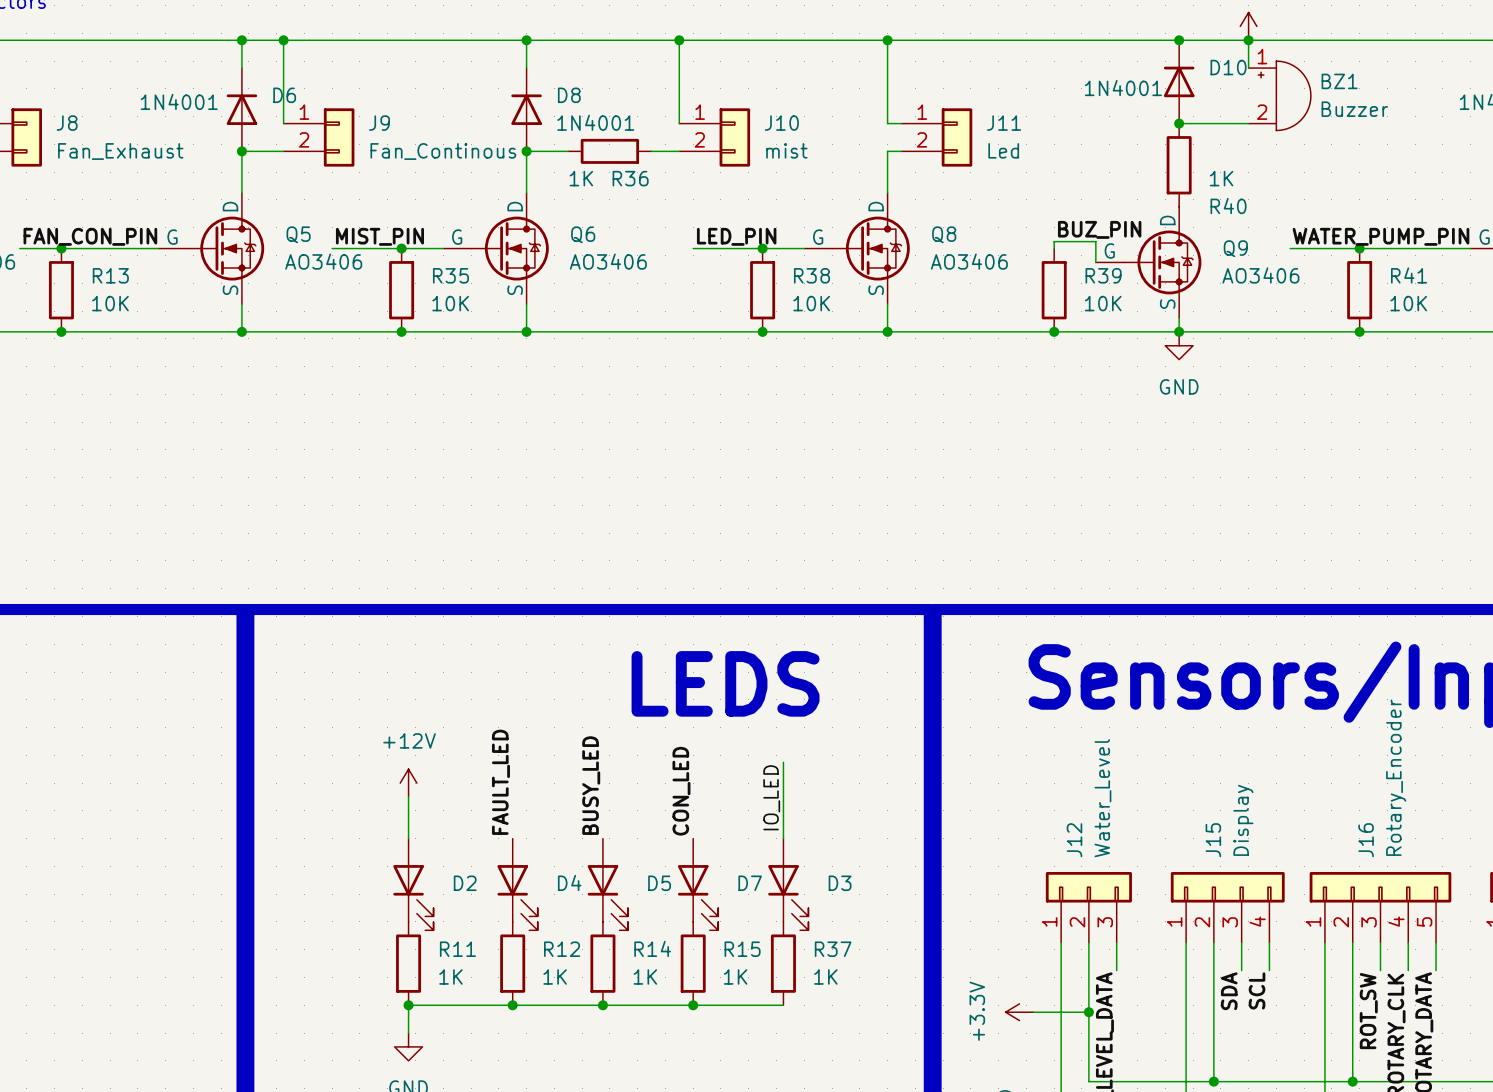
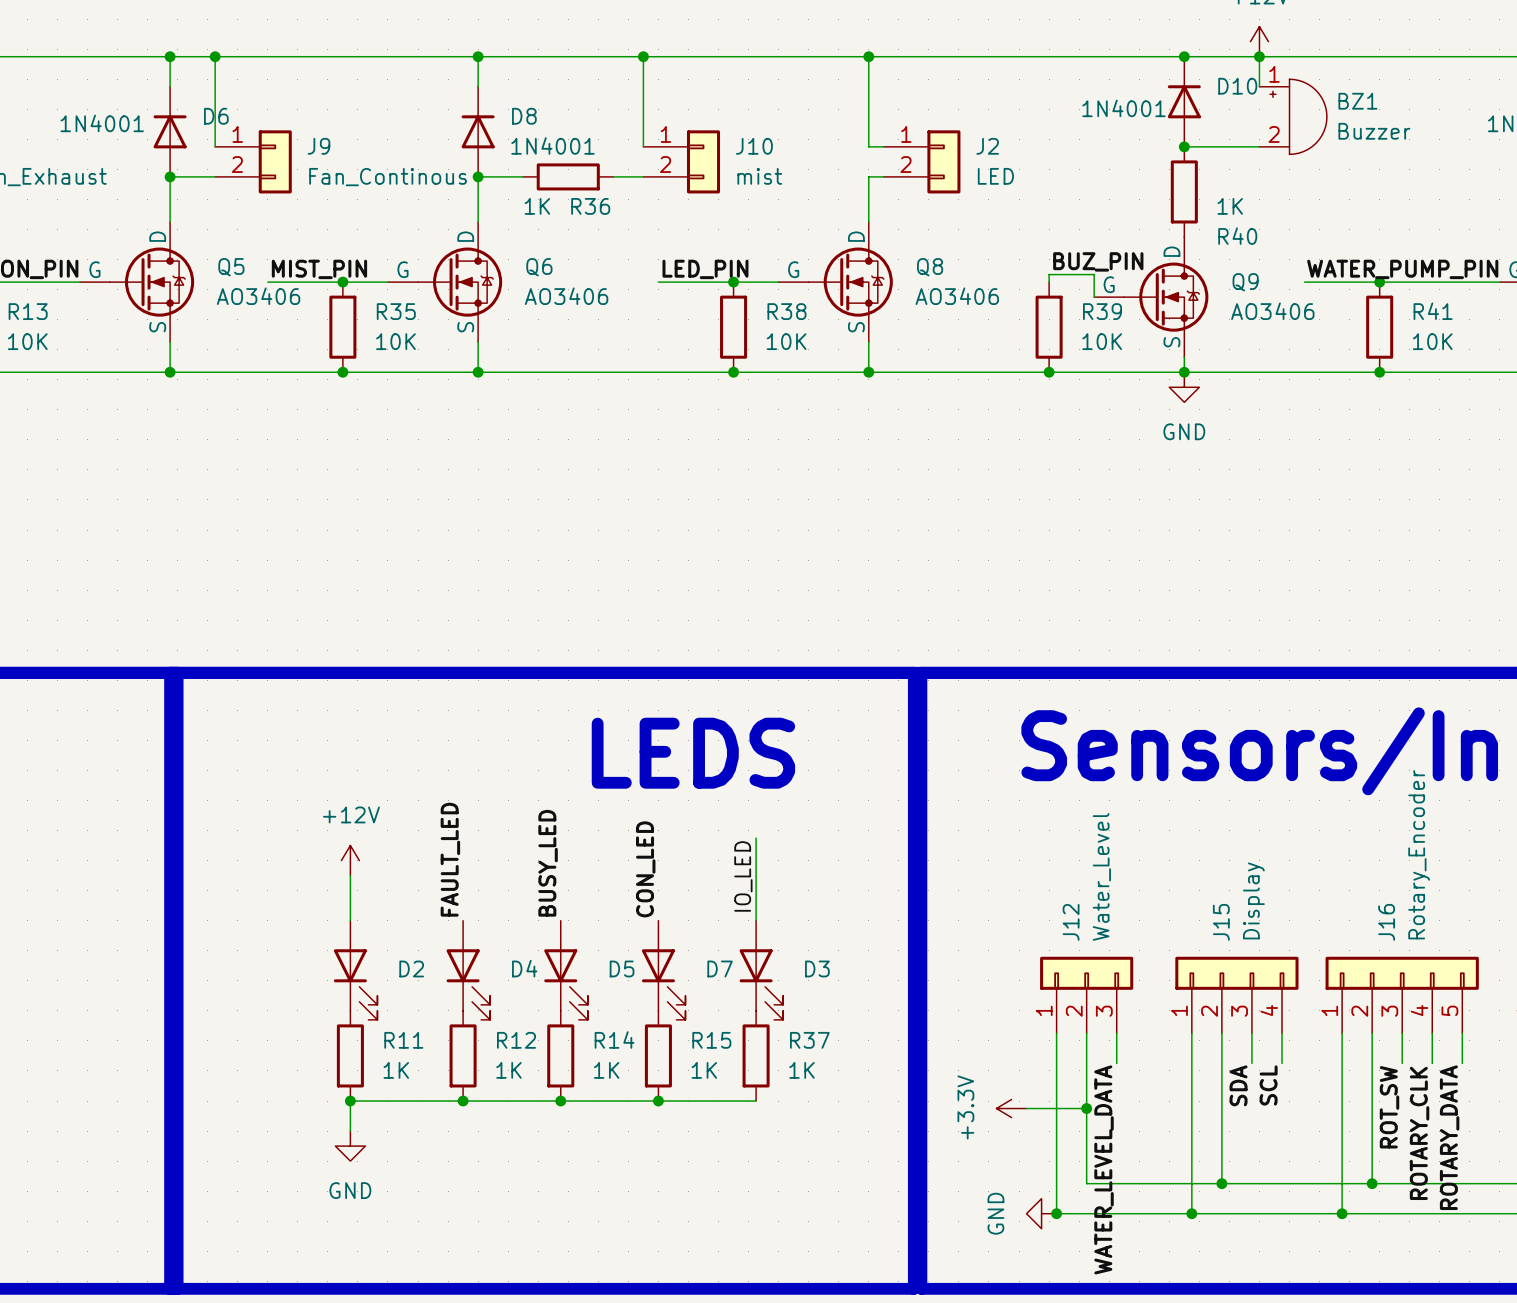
J11 name: J11 (1004, 123) -> J2 (987, 146)
J11 value: Led (1003, 150) -> LED (995, 176)

